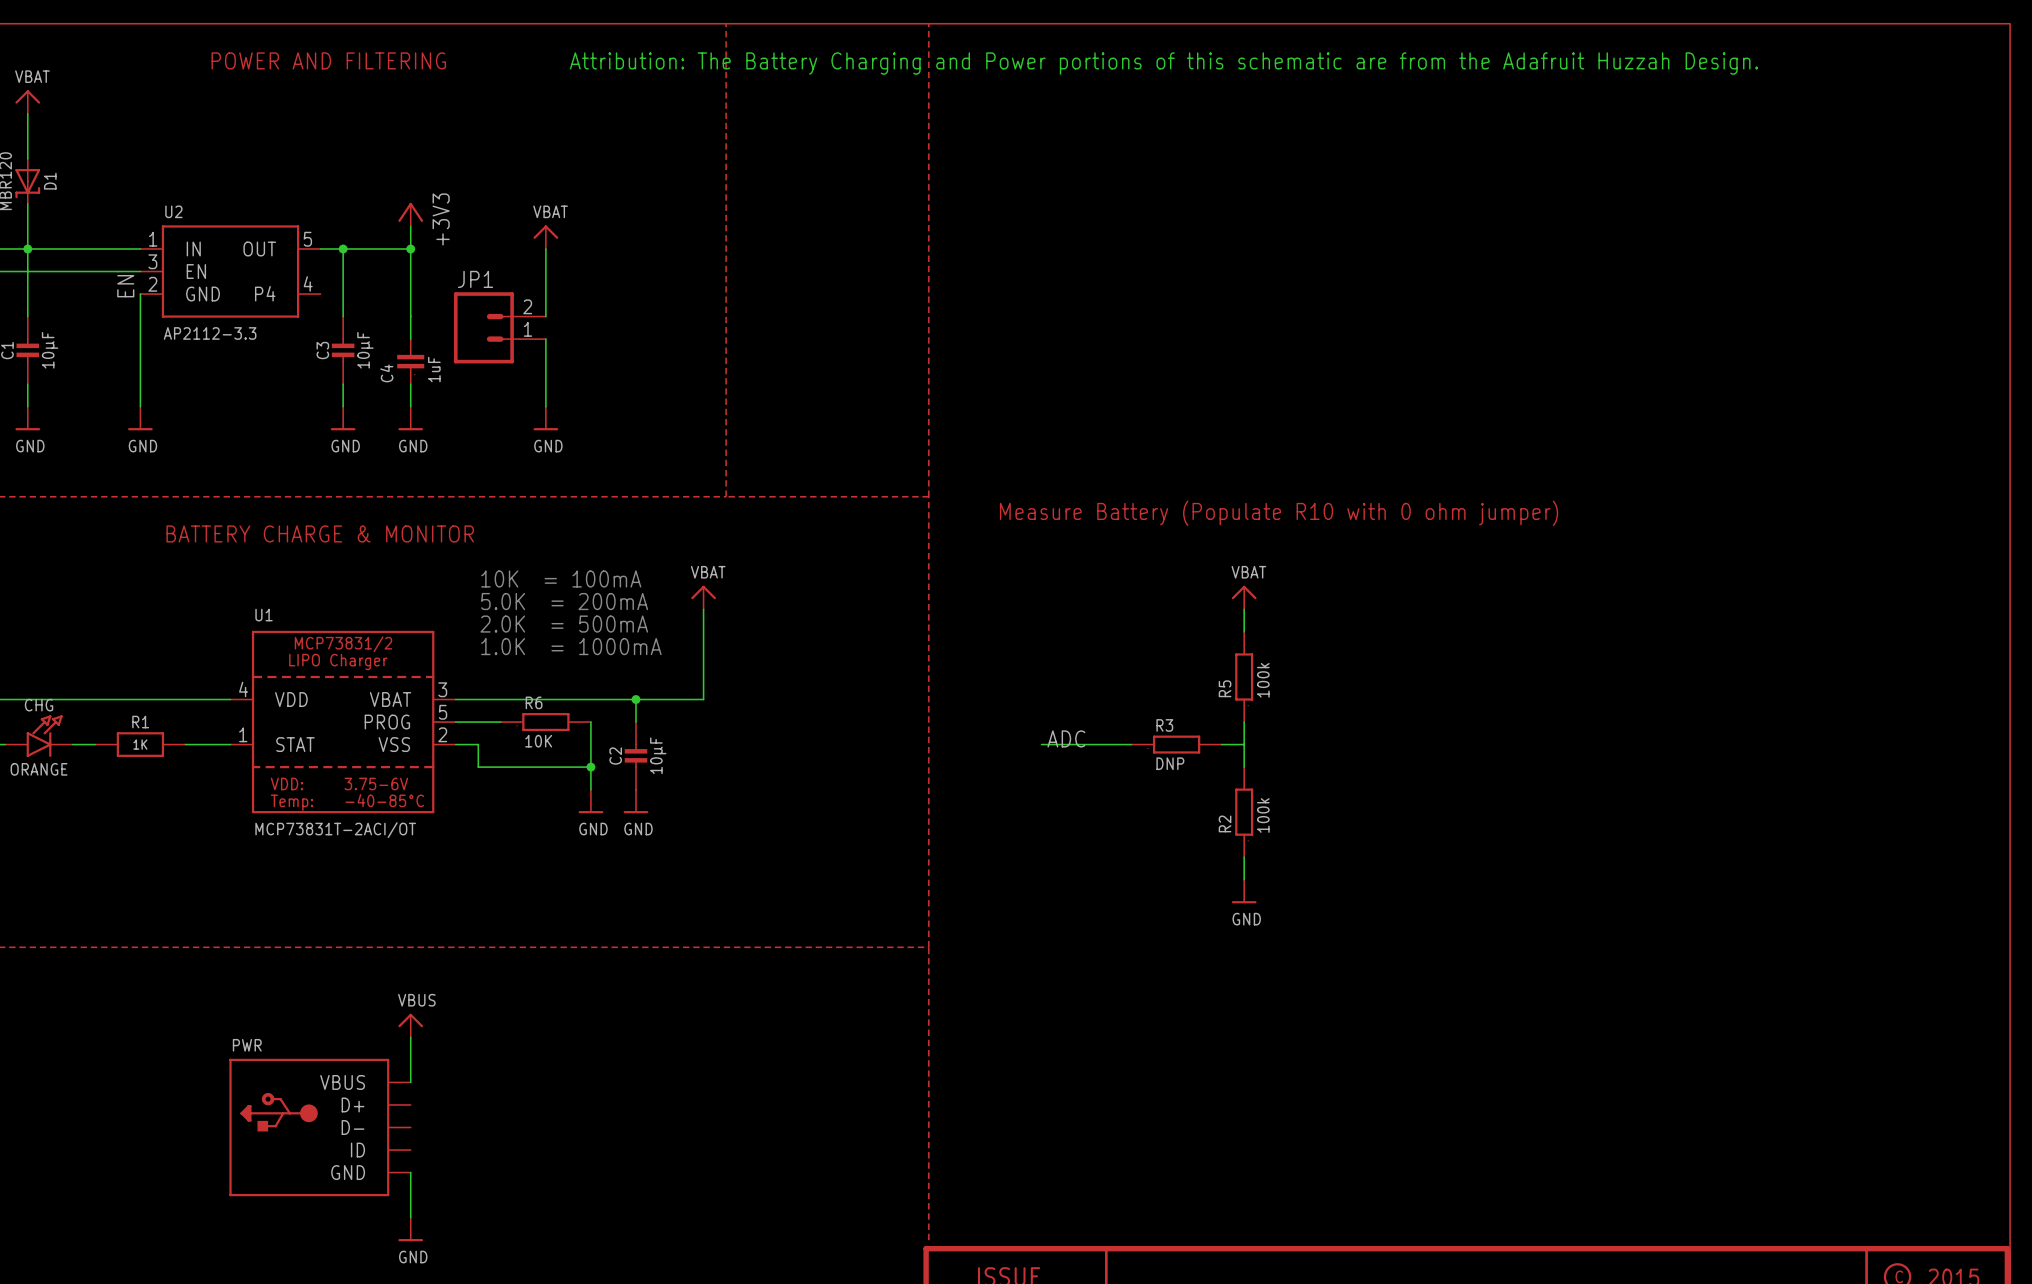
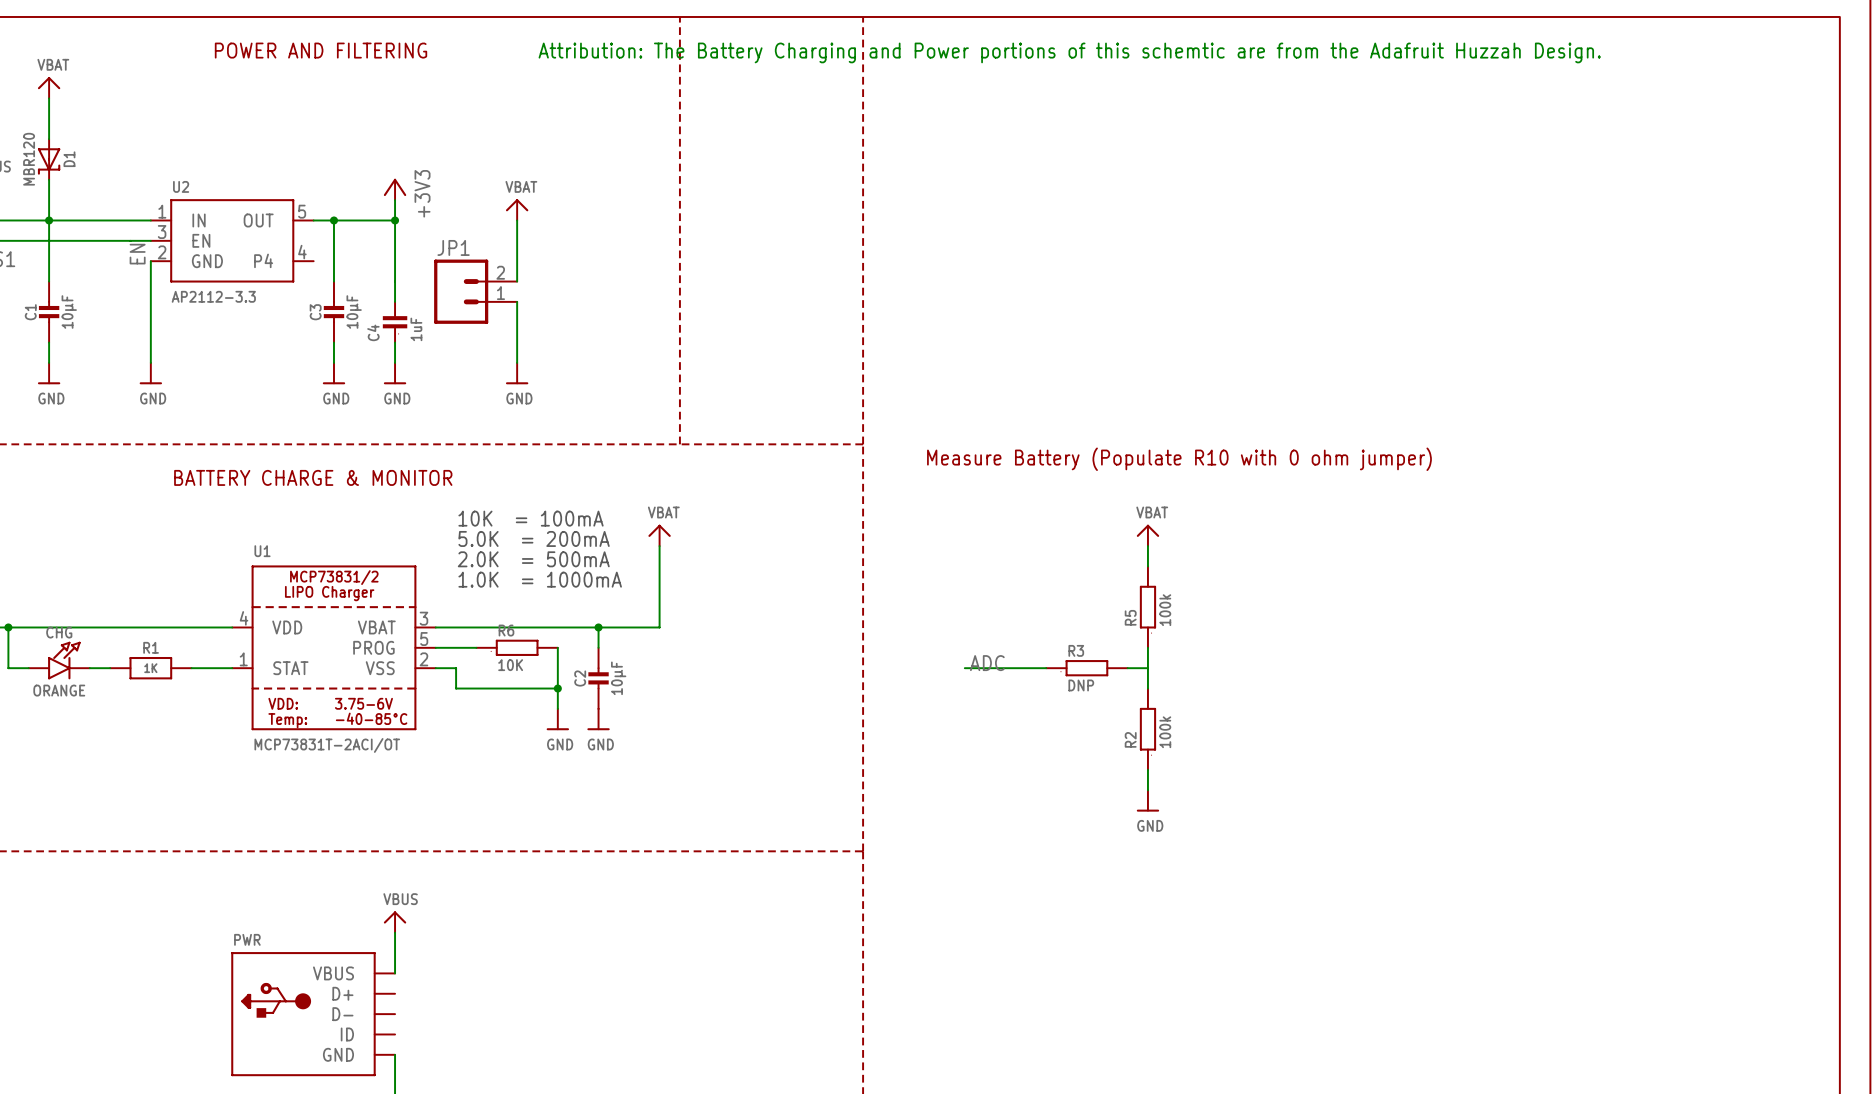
text: Attribution: The Battery Charging and Power portions of this schematic are from the Adafruit Huzzah Design. (1163, 63) -> Attribution: The Battery Charging and Power portions of this schemtic are from the Adafruit Huzzah Design. (1069, 52)

